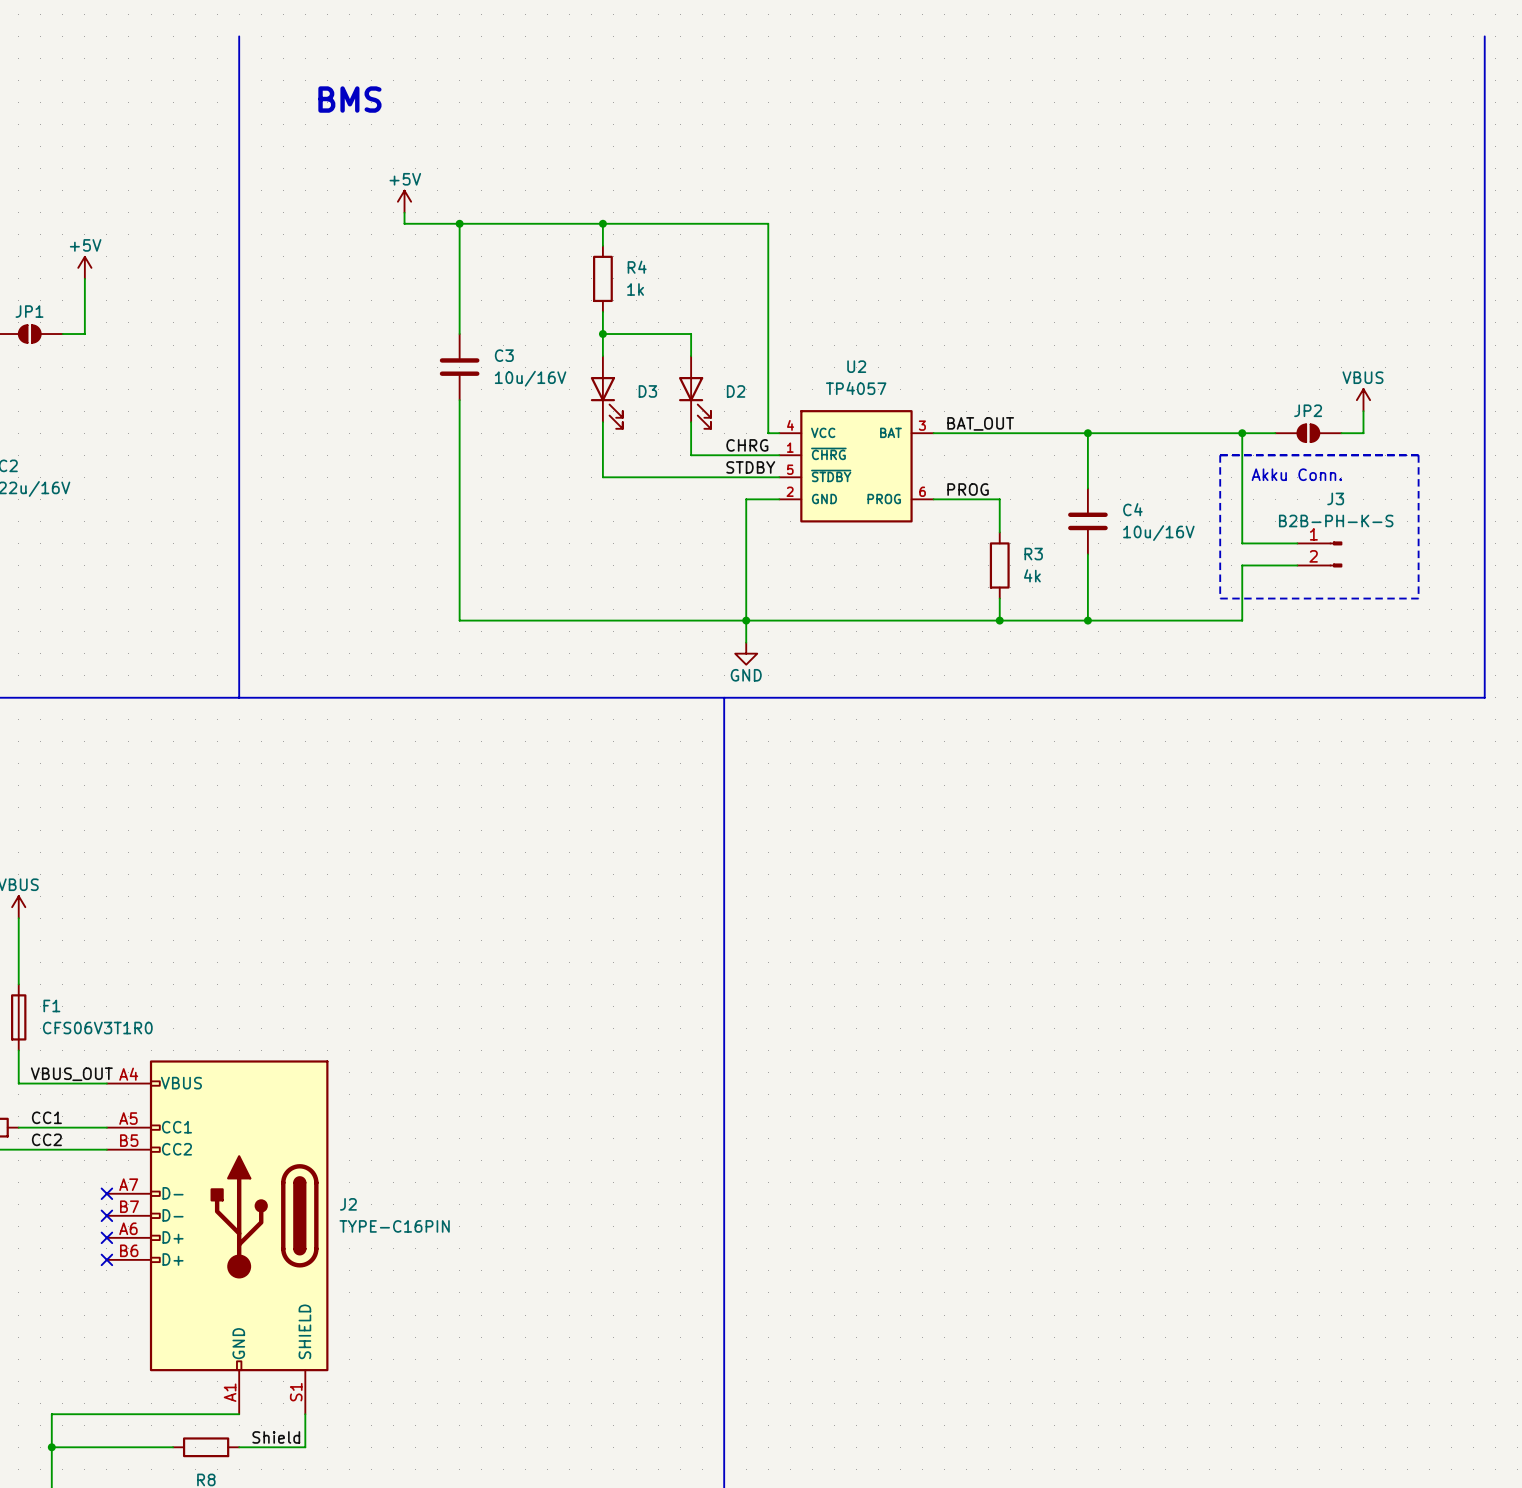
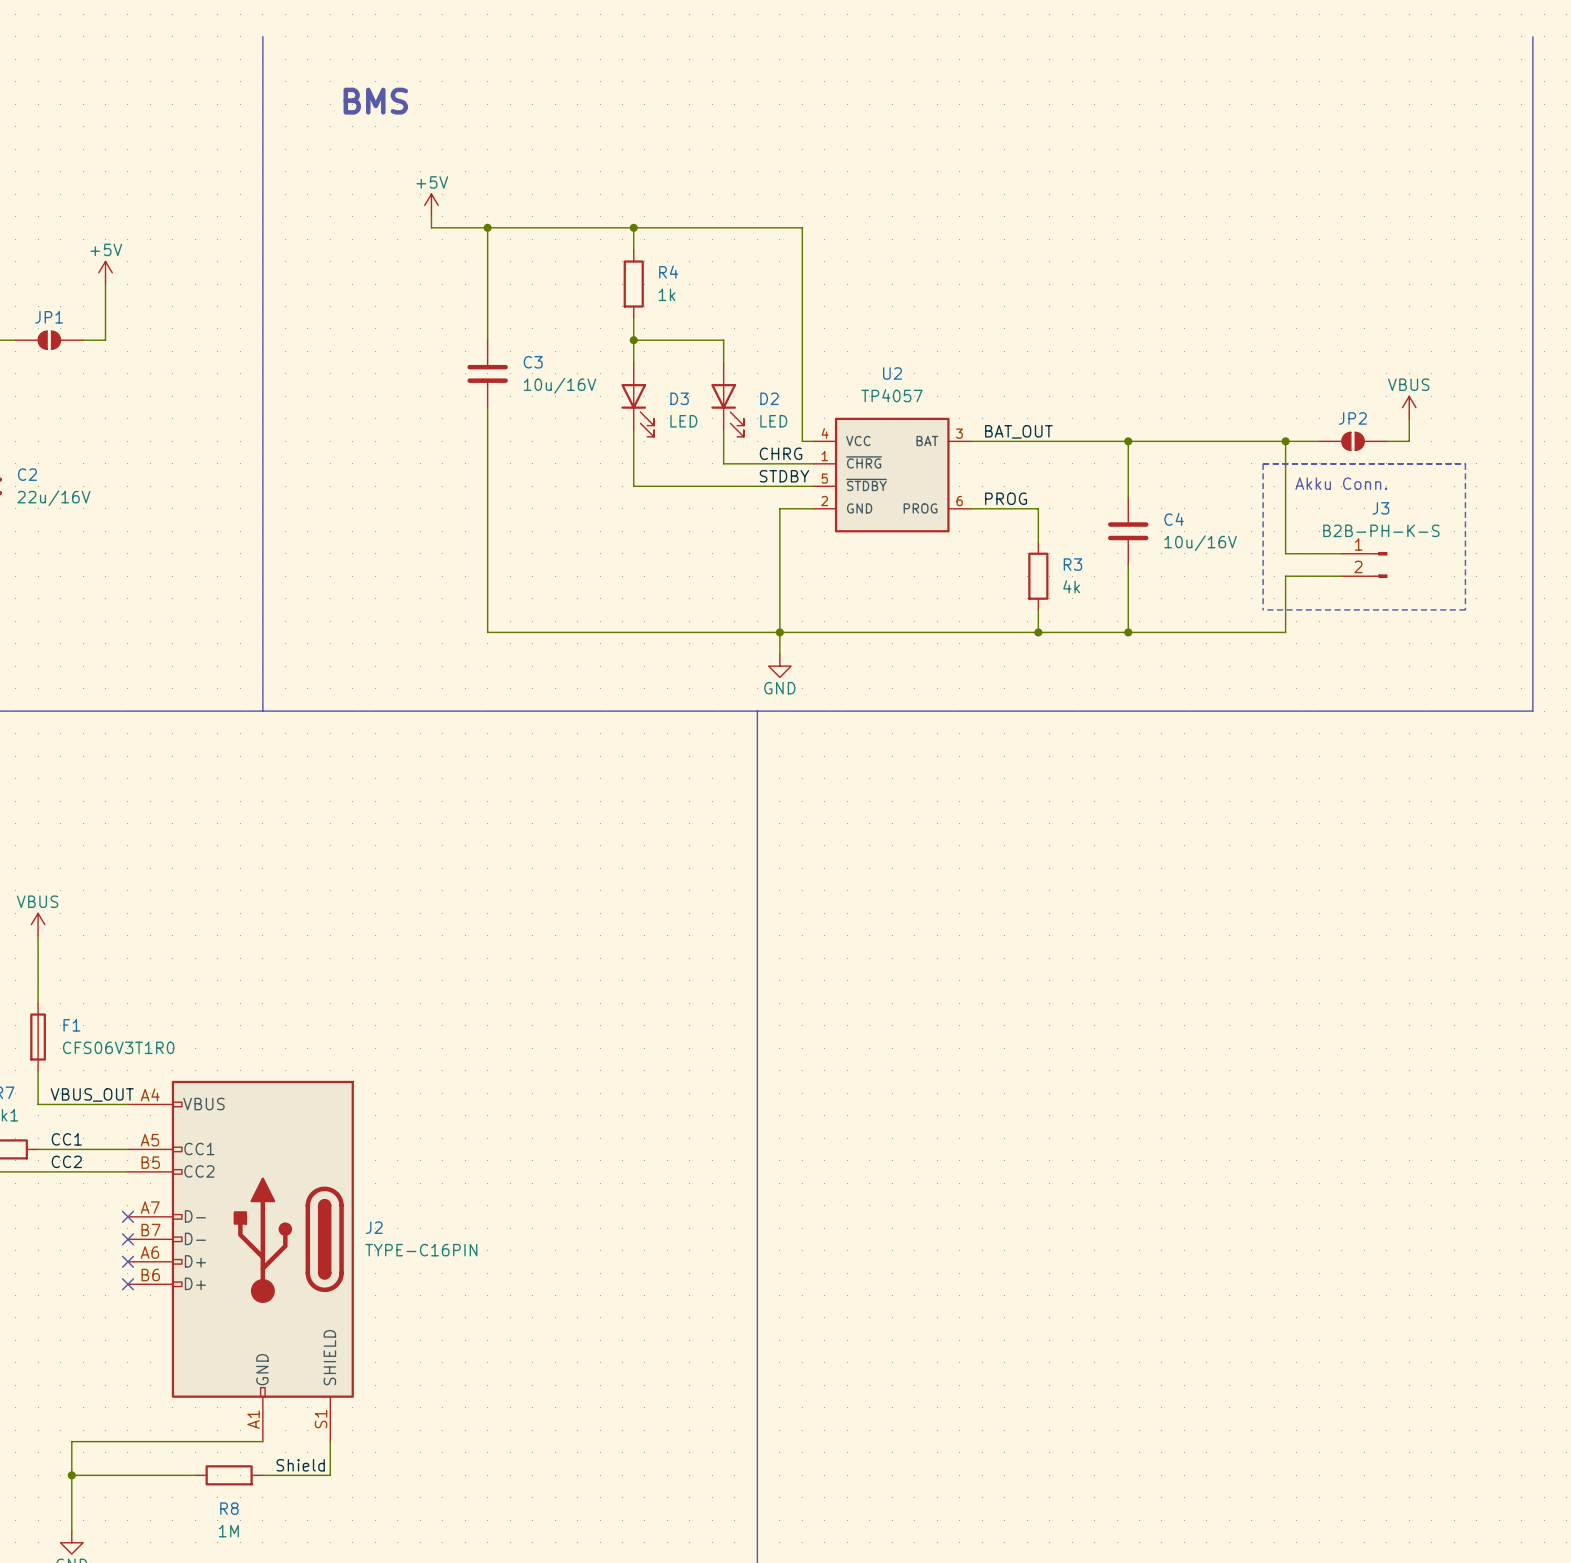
D3 value: none -> LED (683, 421)
D2 value: none -> LED (773, 421)

